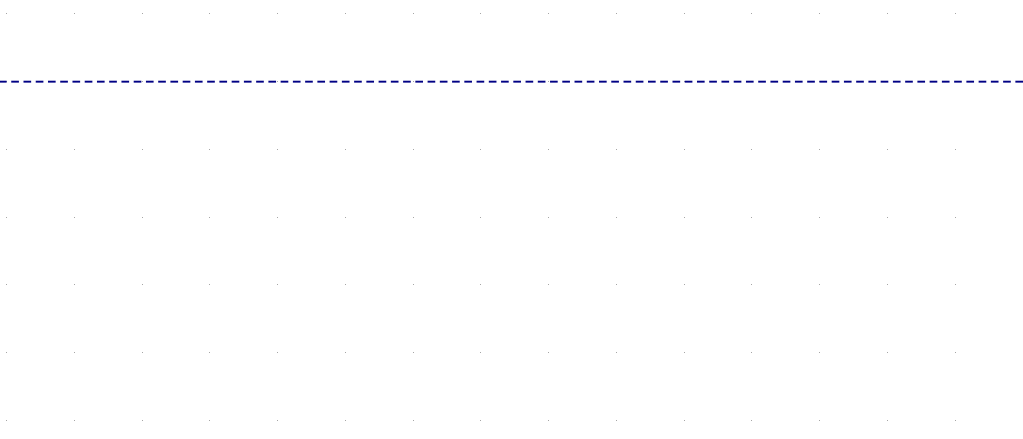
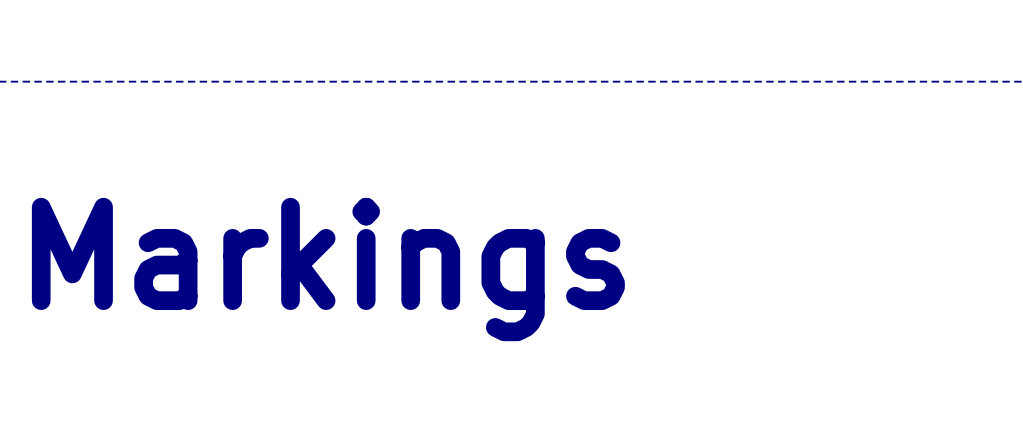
text: none -> Markings (328, 269)

